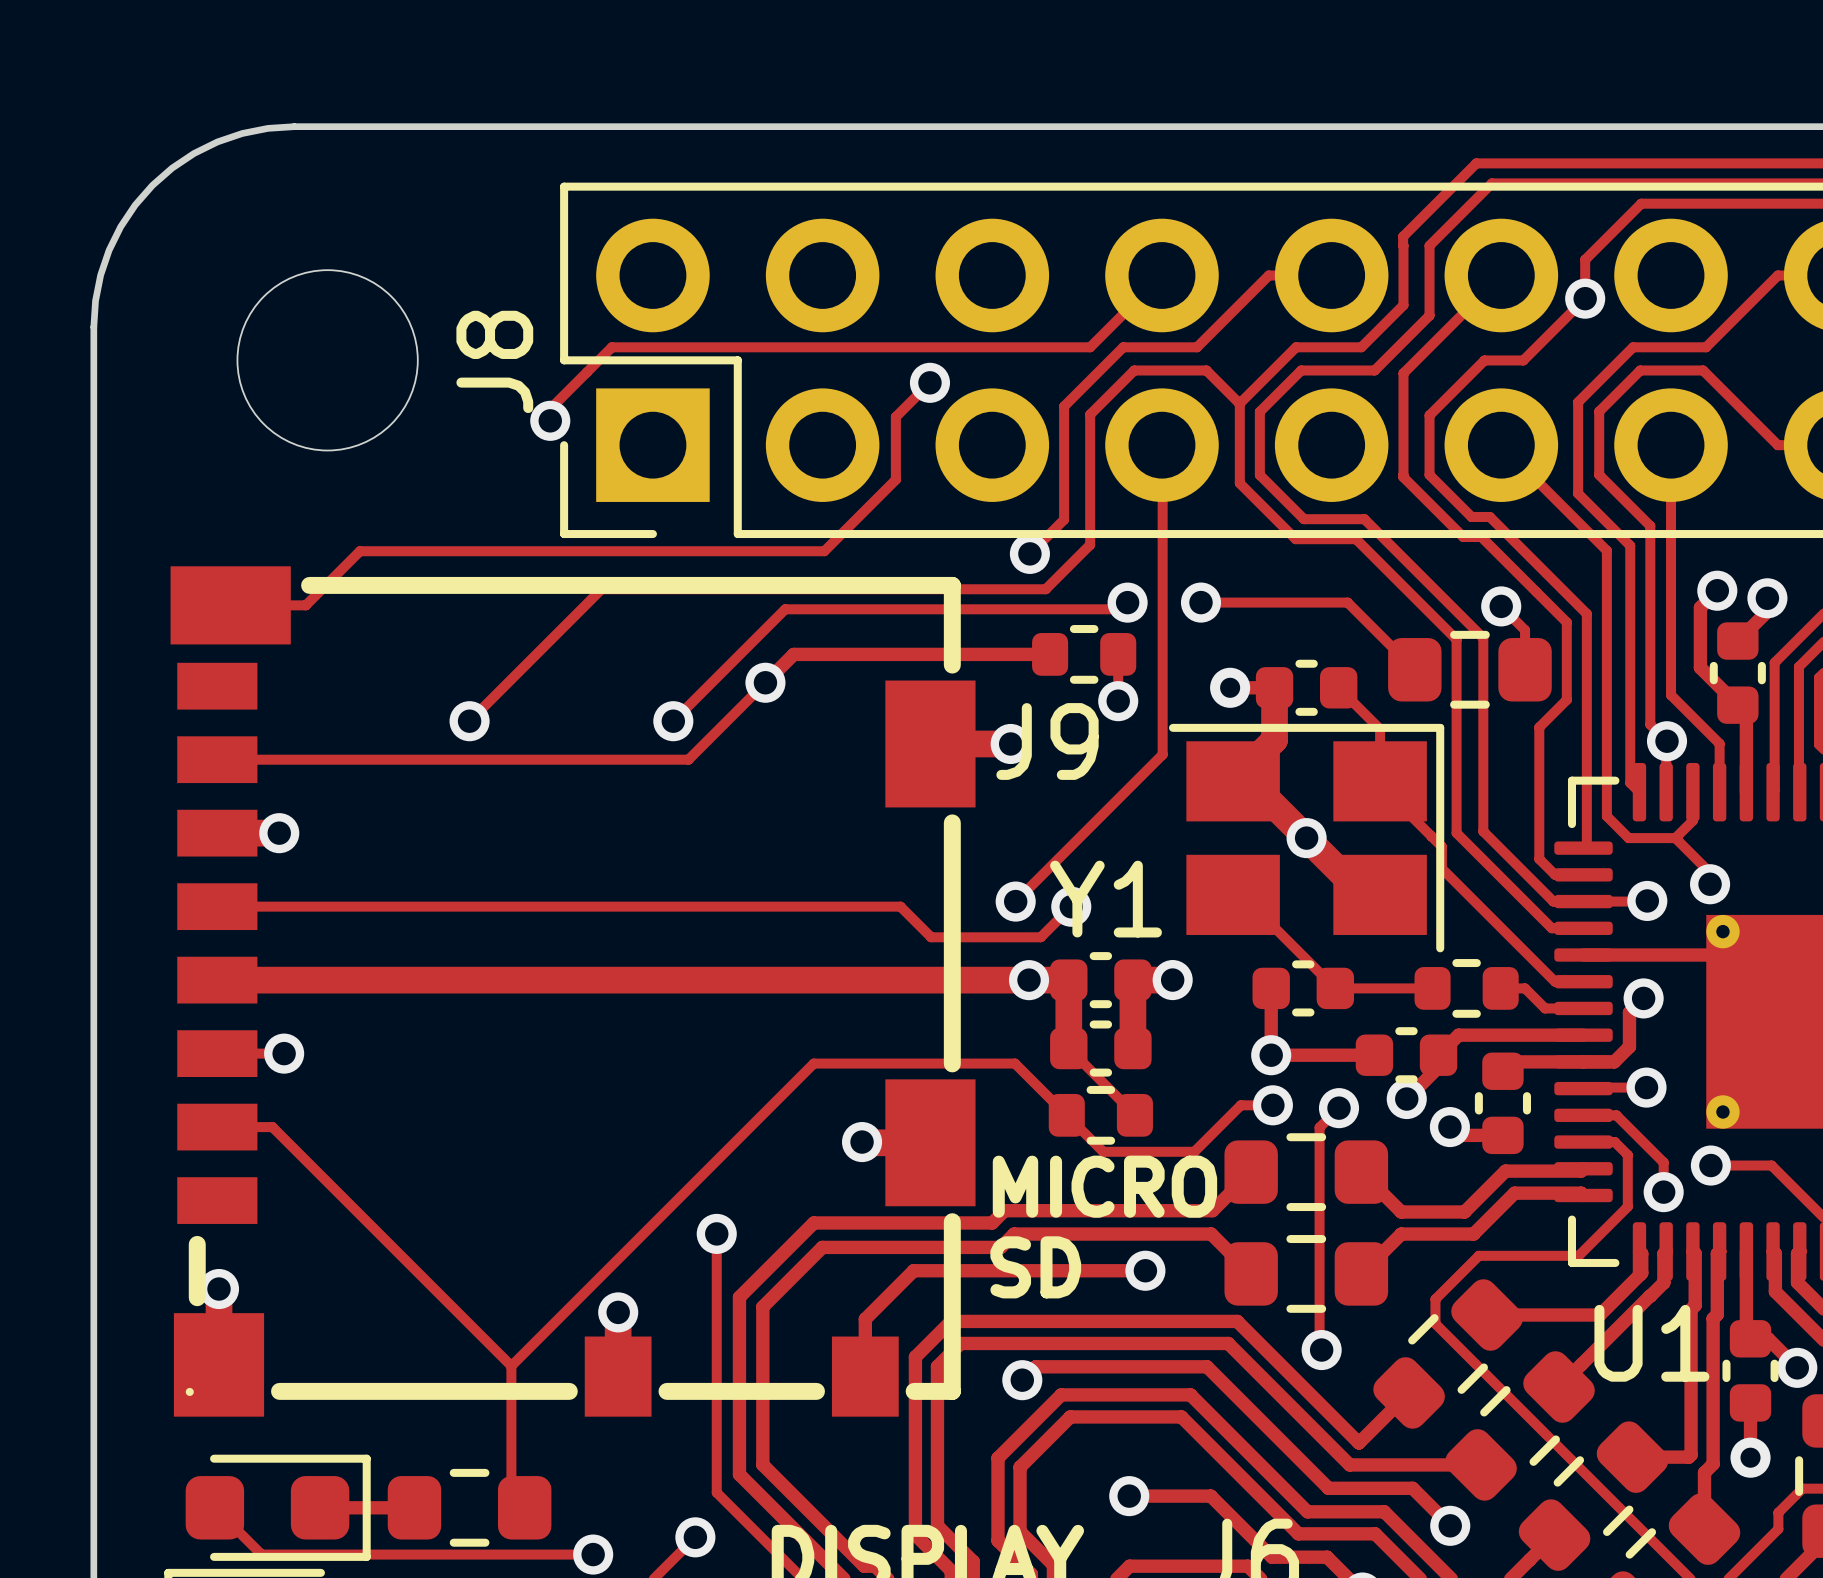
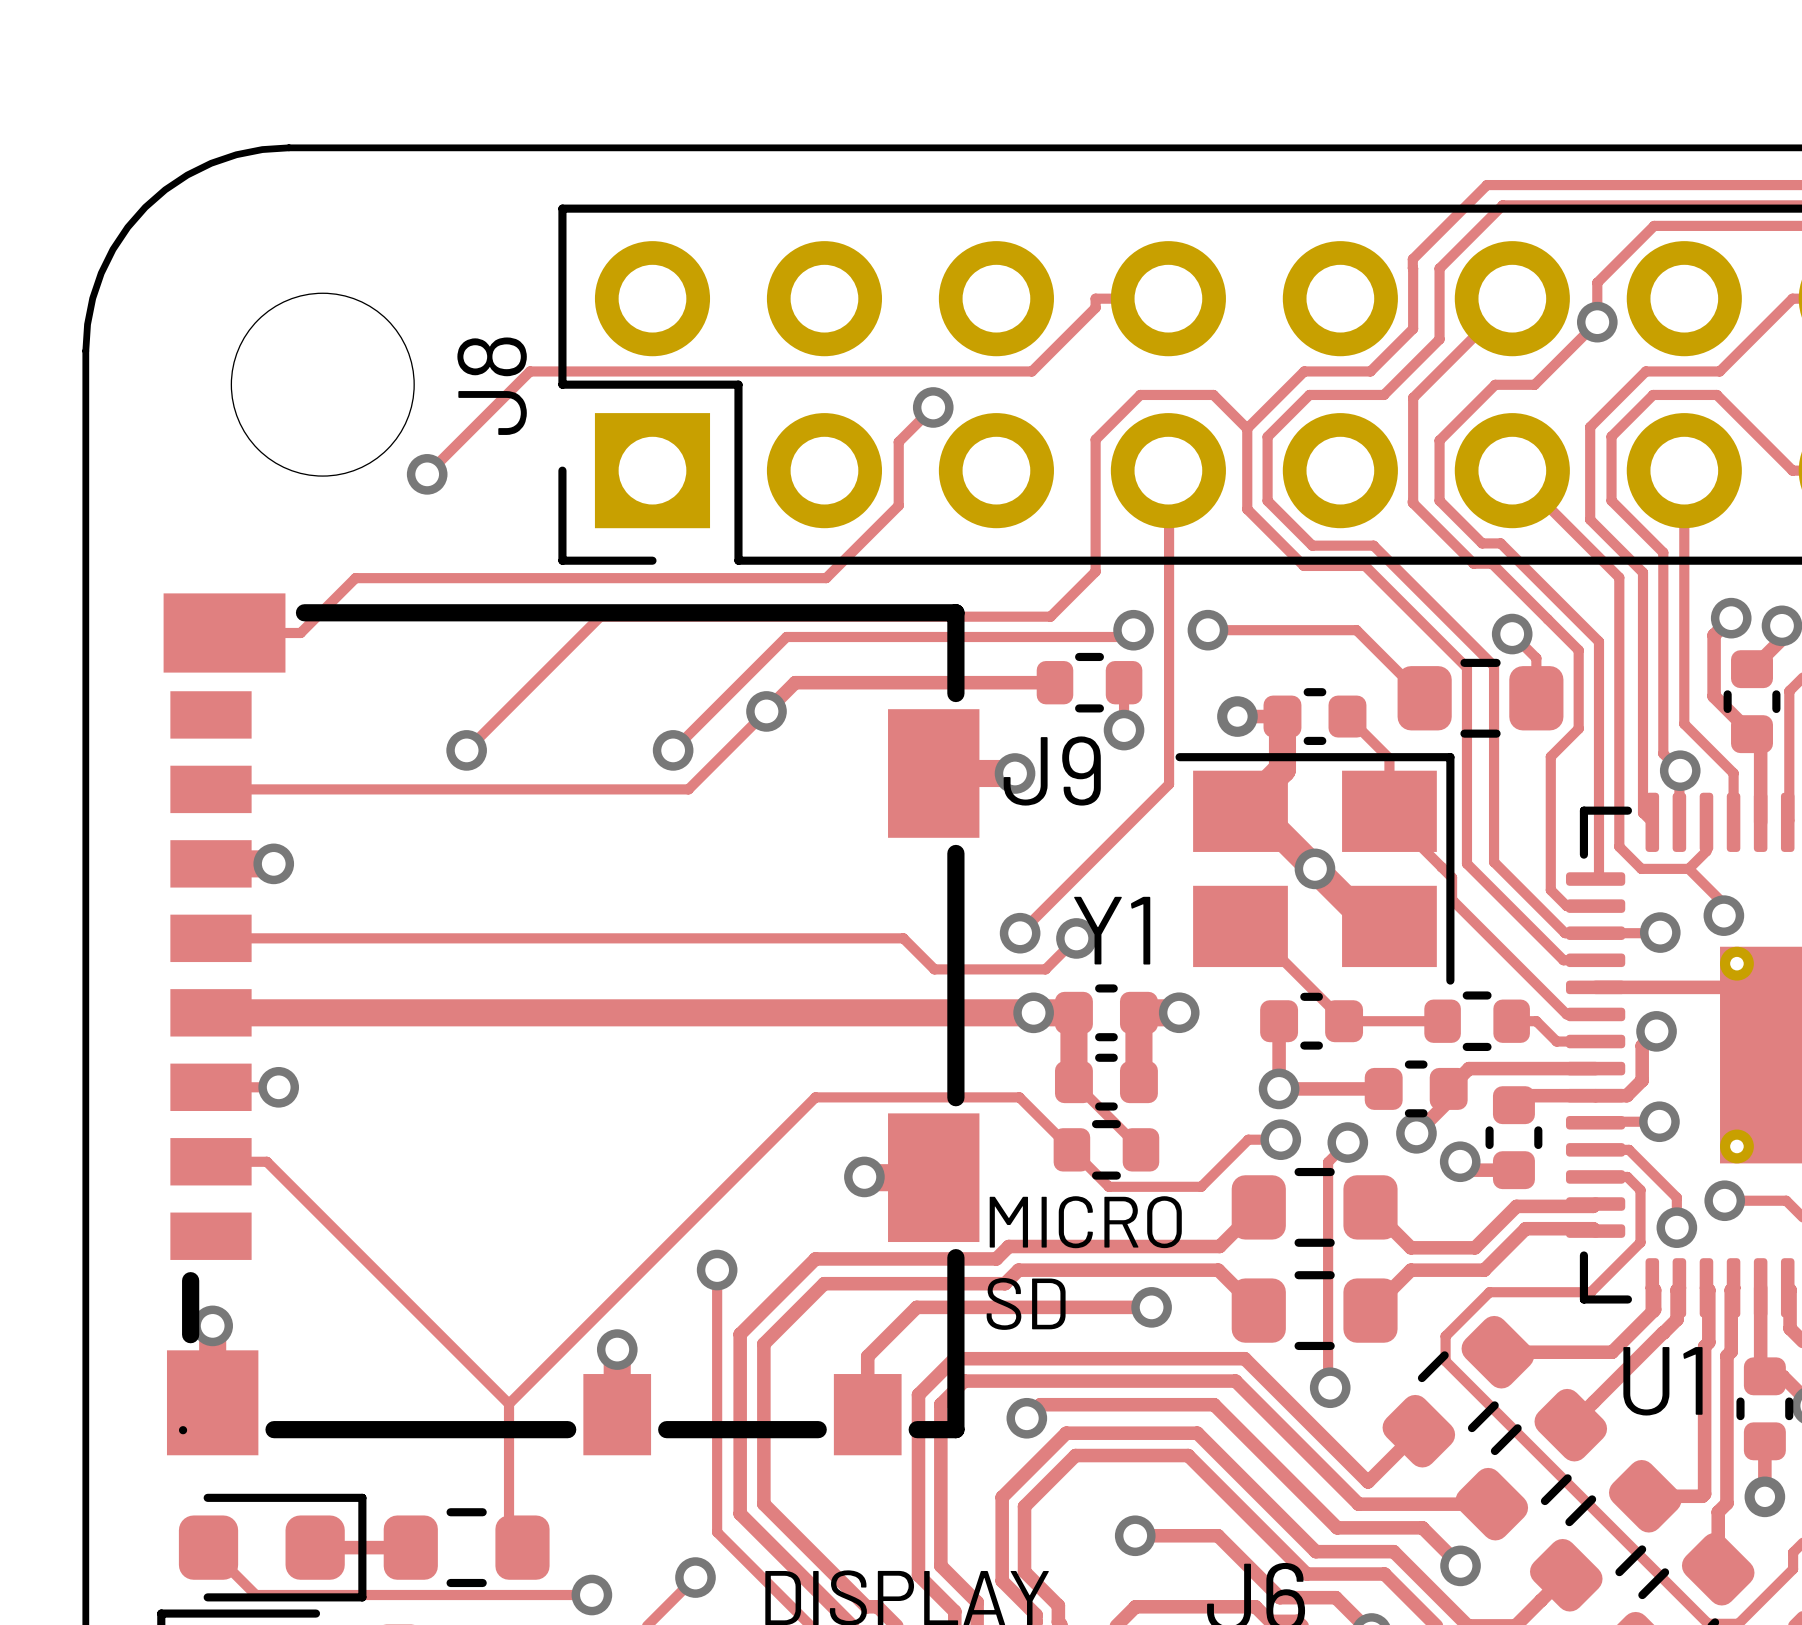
track: (1161, 275) (1090, 347) (1027, 347) -> (1168, 298) (1095, 298) (1095, 307) (1031, 371)
track: (1331, 275) (1268, 275) (1197, 347) (1123, 347) (1064, 406) (1064, 519) (1029, 553) -> none
track: (611, 347) (550, 408) (550, 420) -> (610, 371) (530, 371) (427, 474)
via position: (550, 420) -> (427, 474)
via: (1029, 553) -> none

